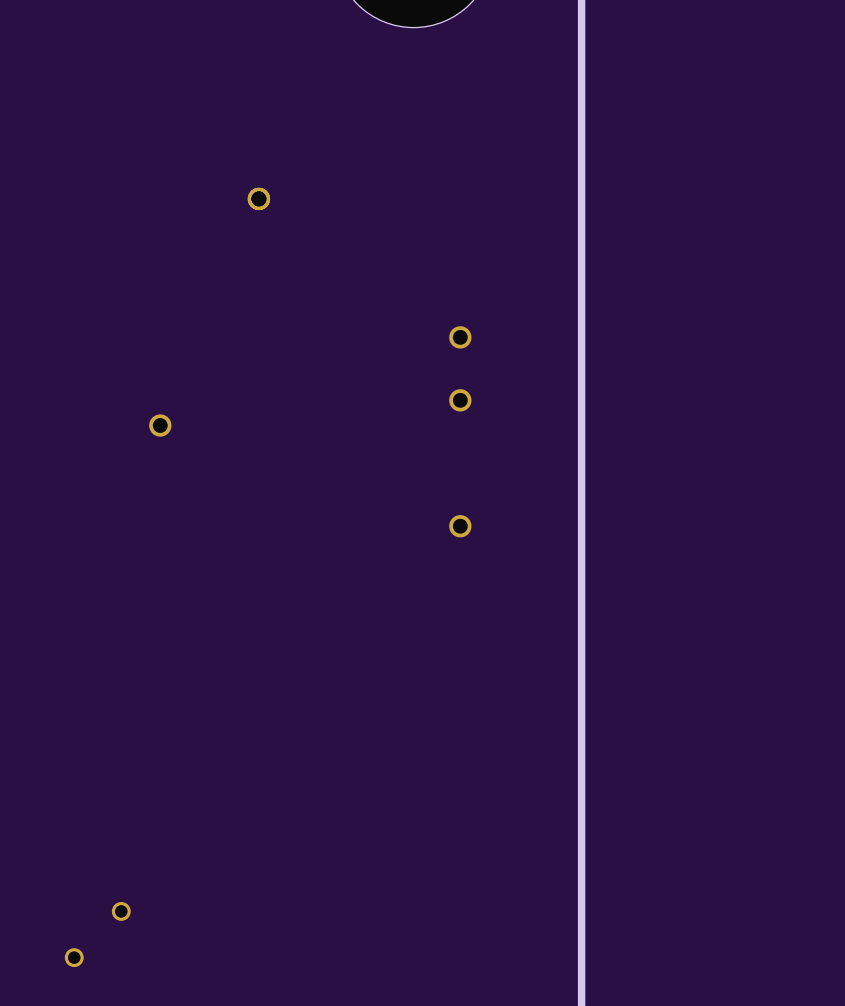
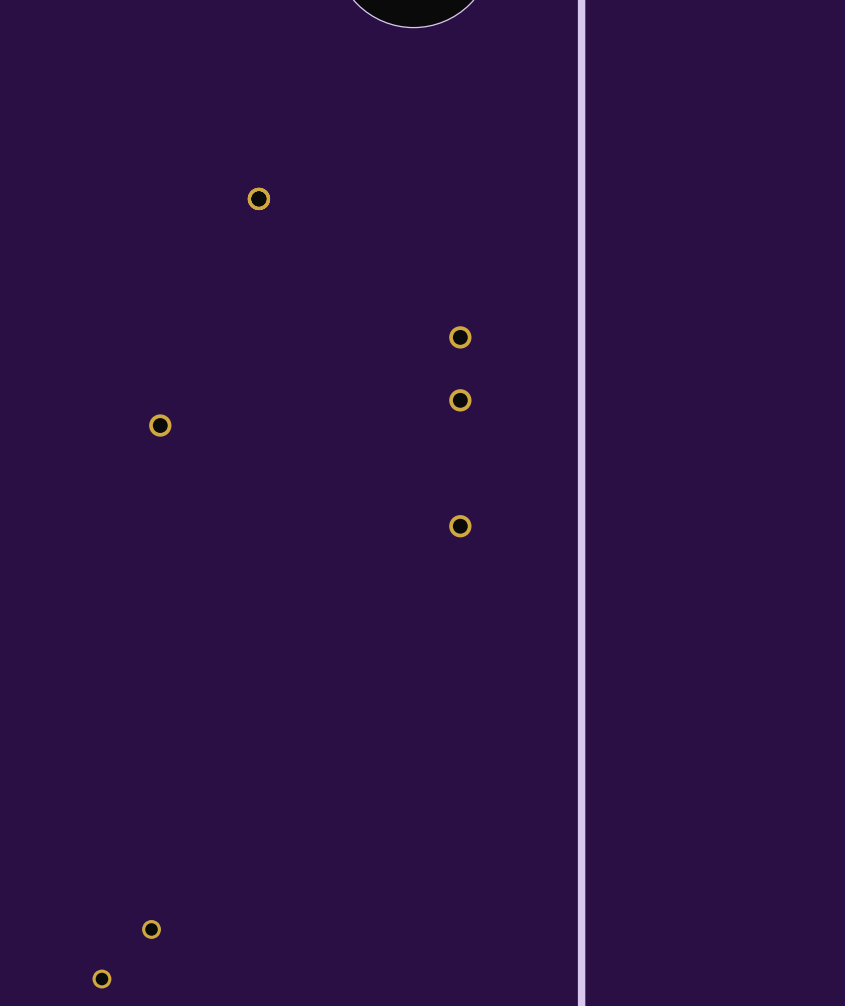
via: (121, 911) -> none
via: none -> (151, 929)
via: (74, 957) -> none
via: none -> (101, 979)

